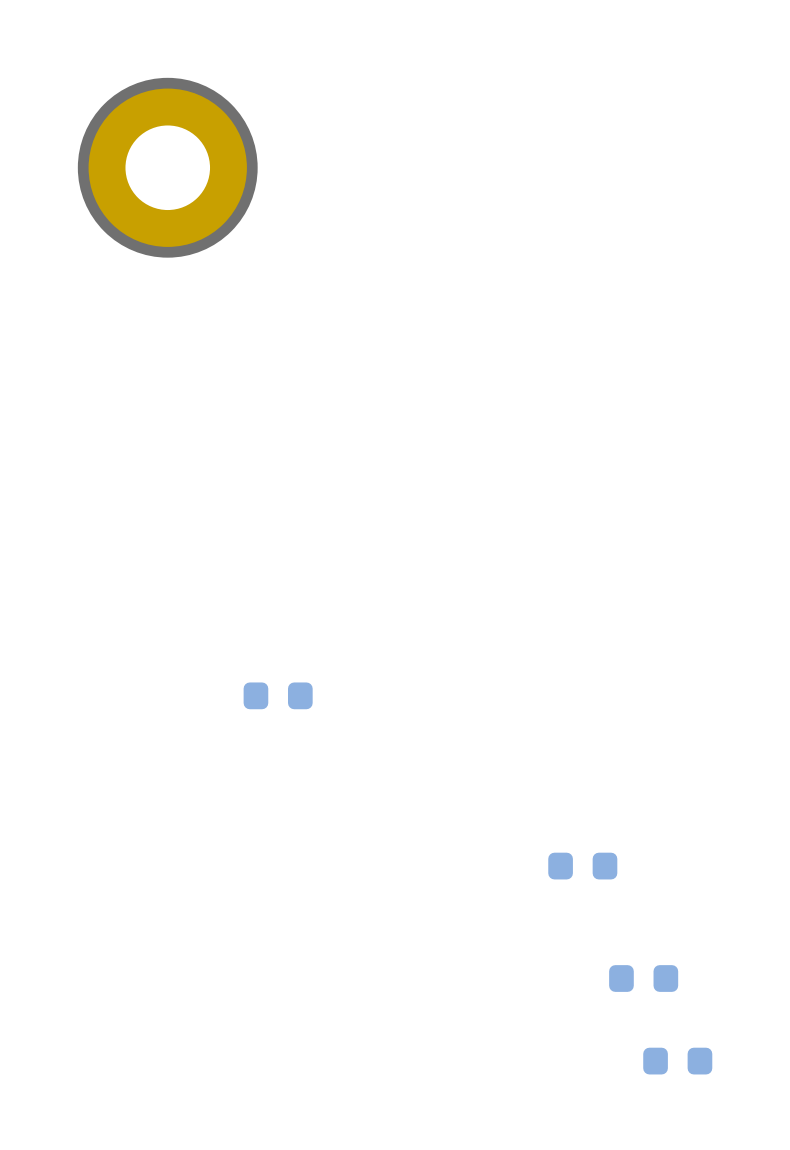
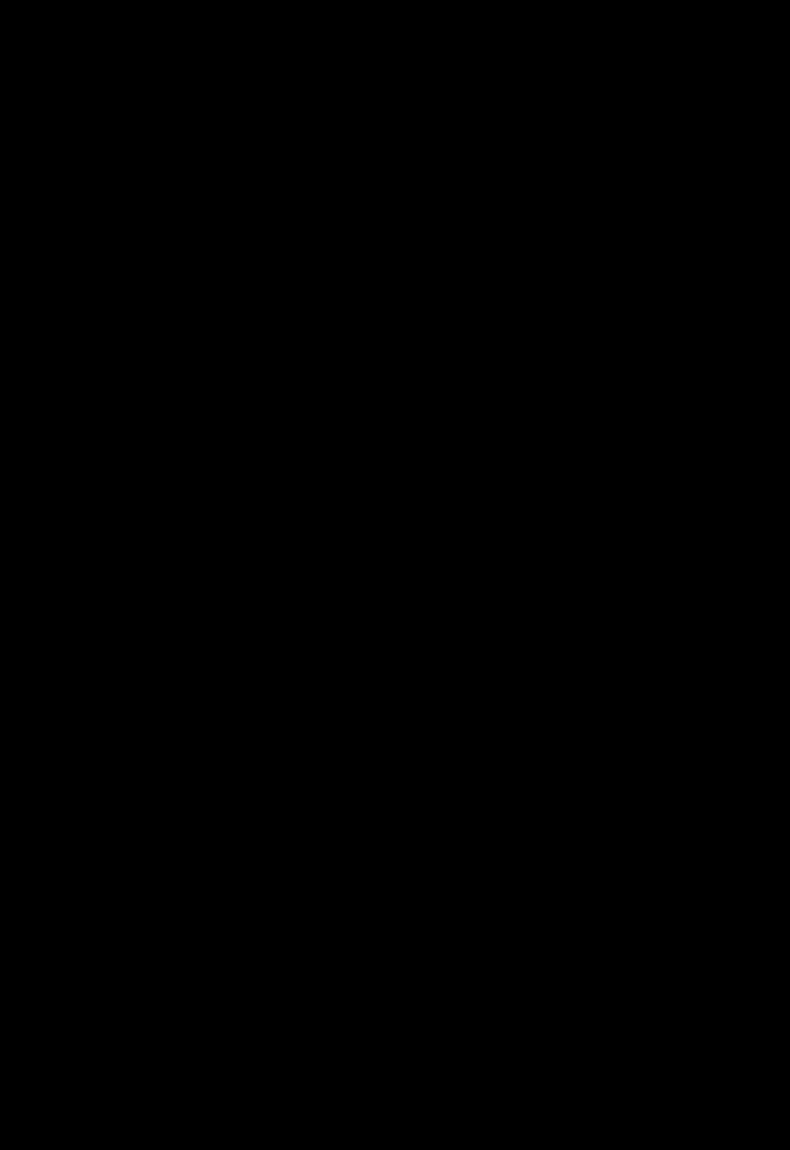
part: (167, 167) -> none
part: (278, 695) -> none
part: (582, 866) -> none
part: (643, 978) -> none
part: (677, 1061) -> none

